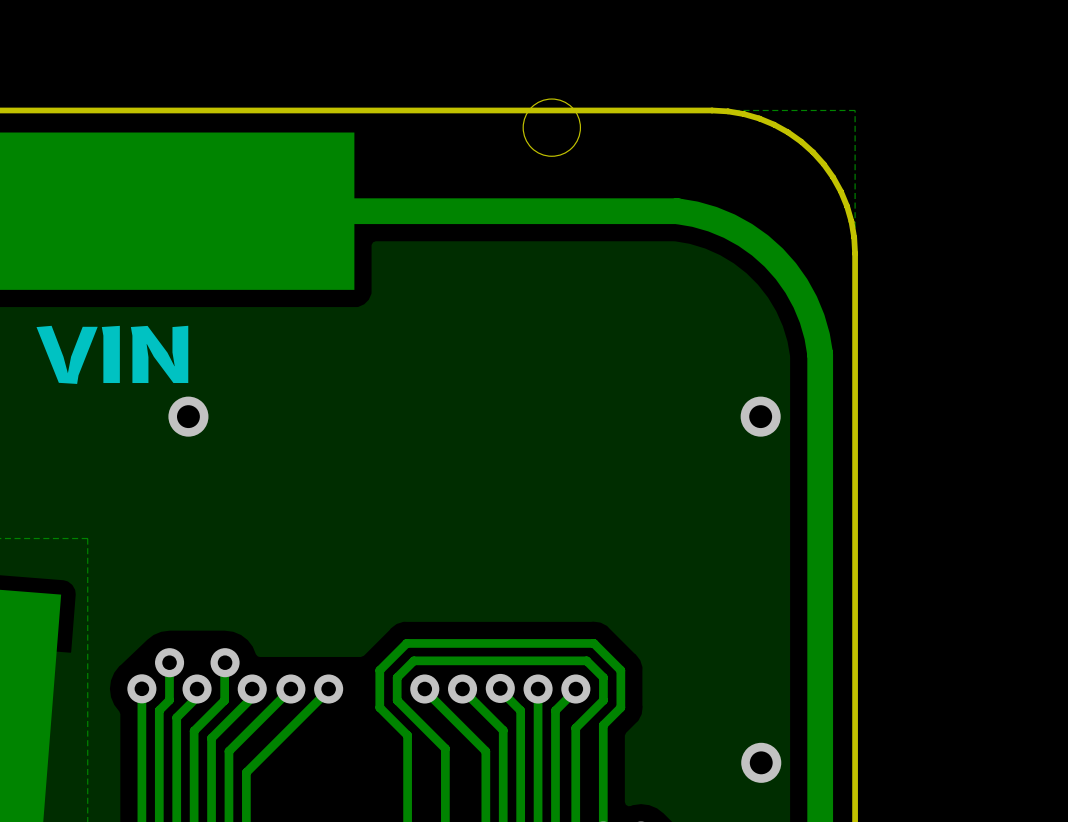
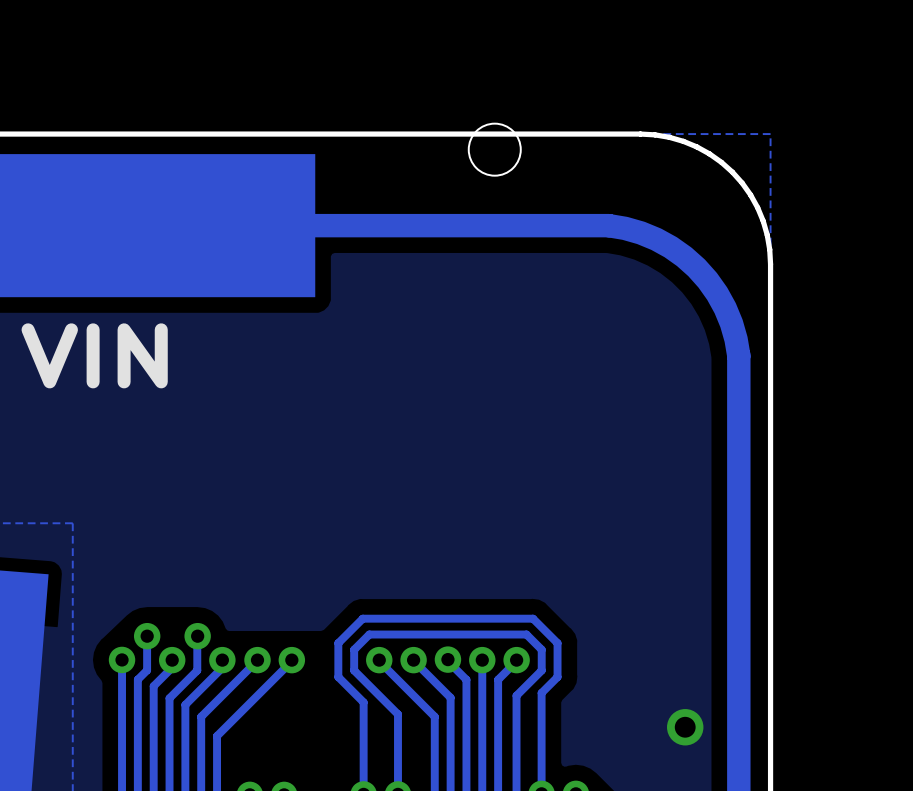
via: (188, 416) -> none
via: (760, 416) -> none

